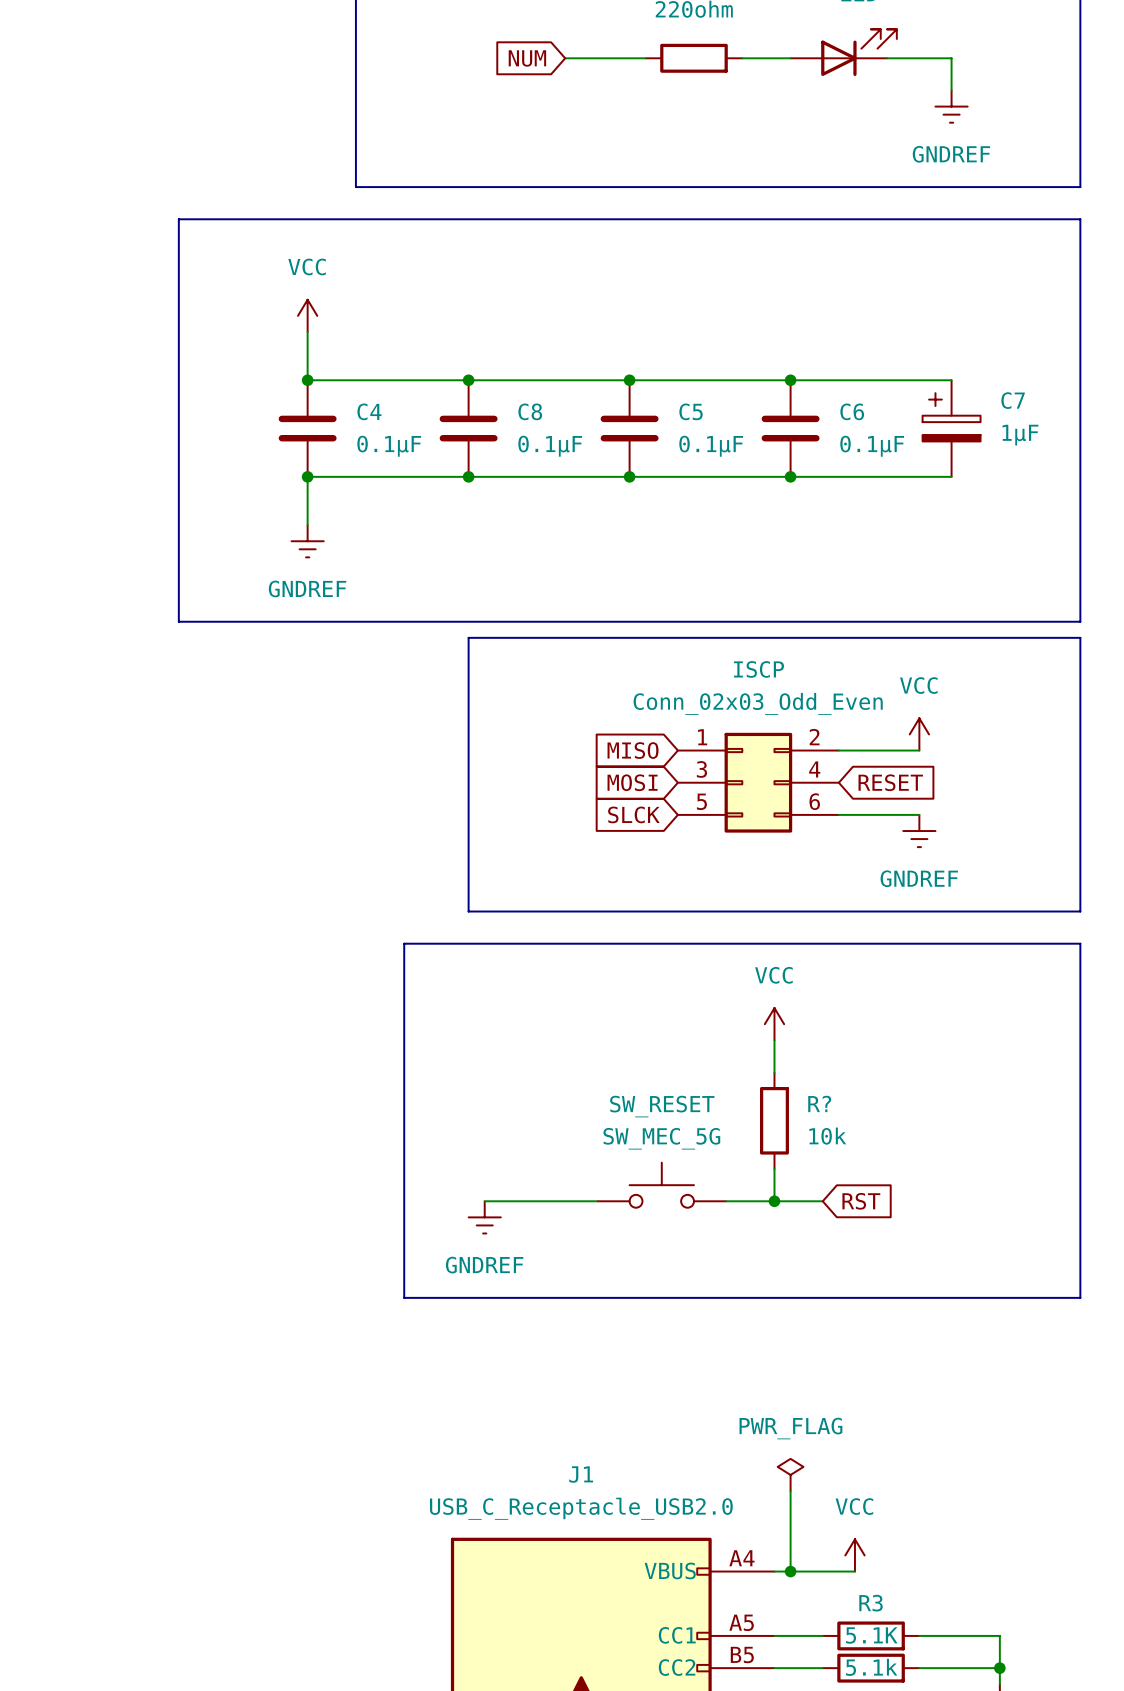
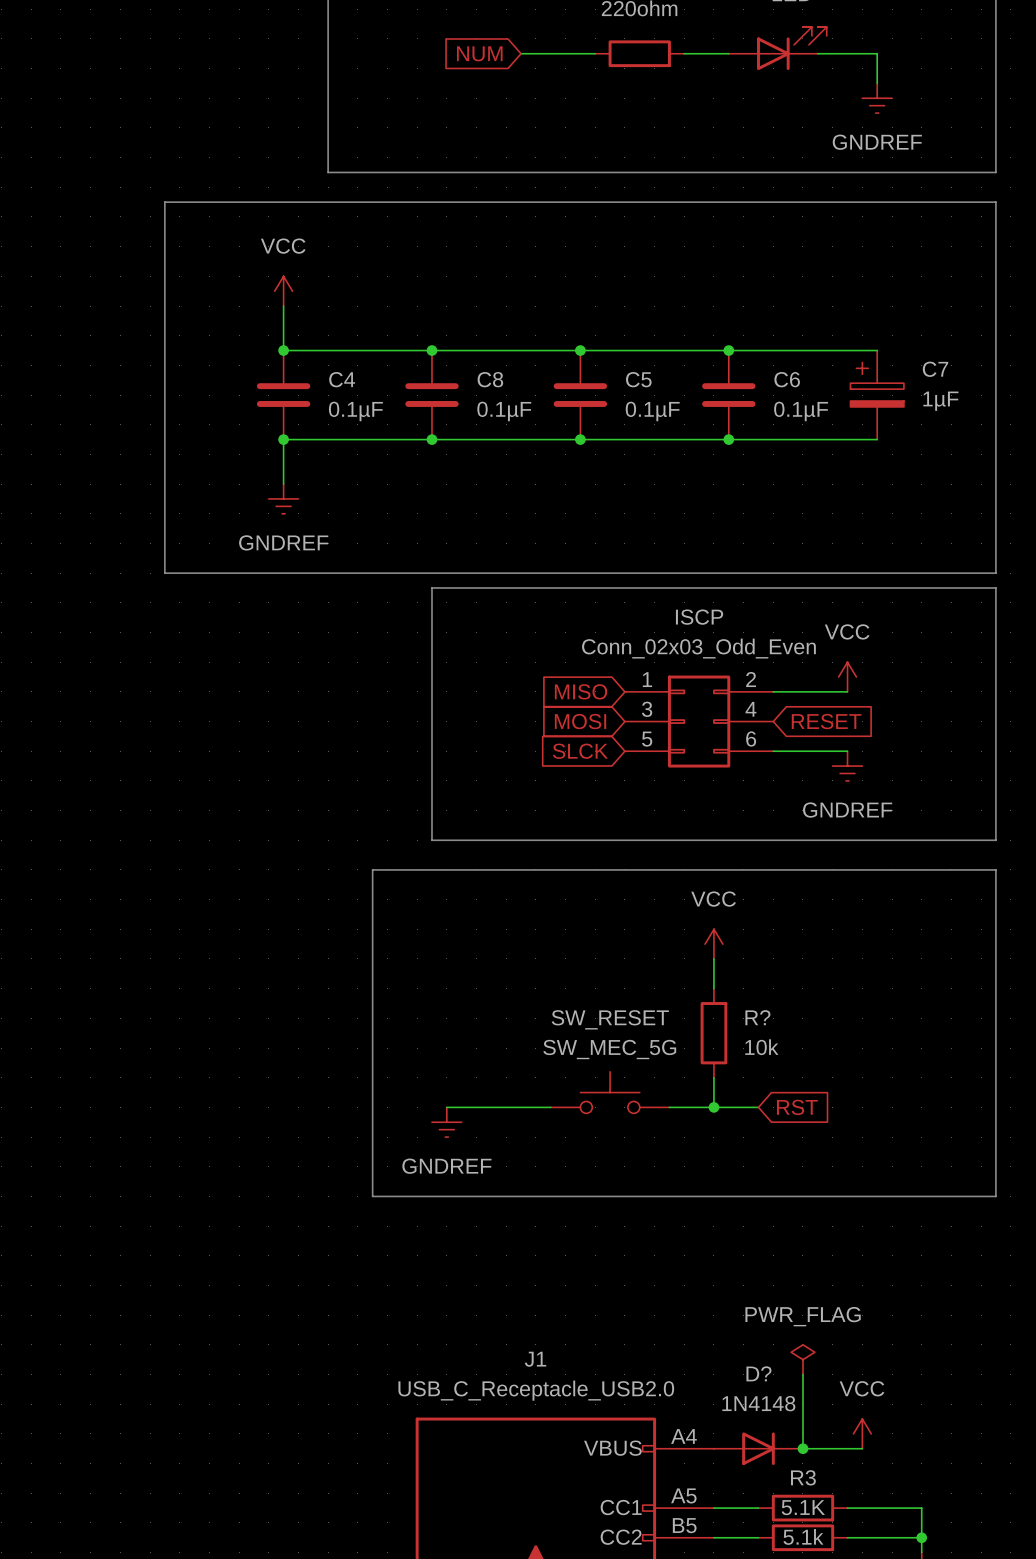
power symbol position: PWR_FLAG (790, 1474) -> PWR_FLAG (802, 1359)
wire: (790, 1491) (790, 1571) -> none
wire: none -> (802, 1374) (802, 1448) (862, 1448)
power symbol position: VCC (854, 1555) -> VCC (862, 1433)
junction: (790, 1571) -> none
D?: none -> 1N4148 (758, 1448)
junction: none -> (802, 1448)

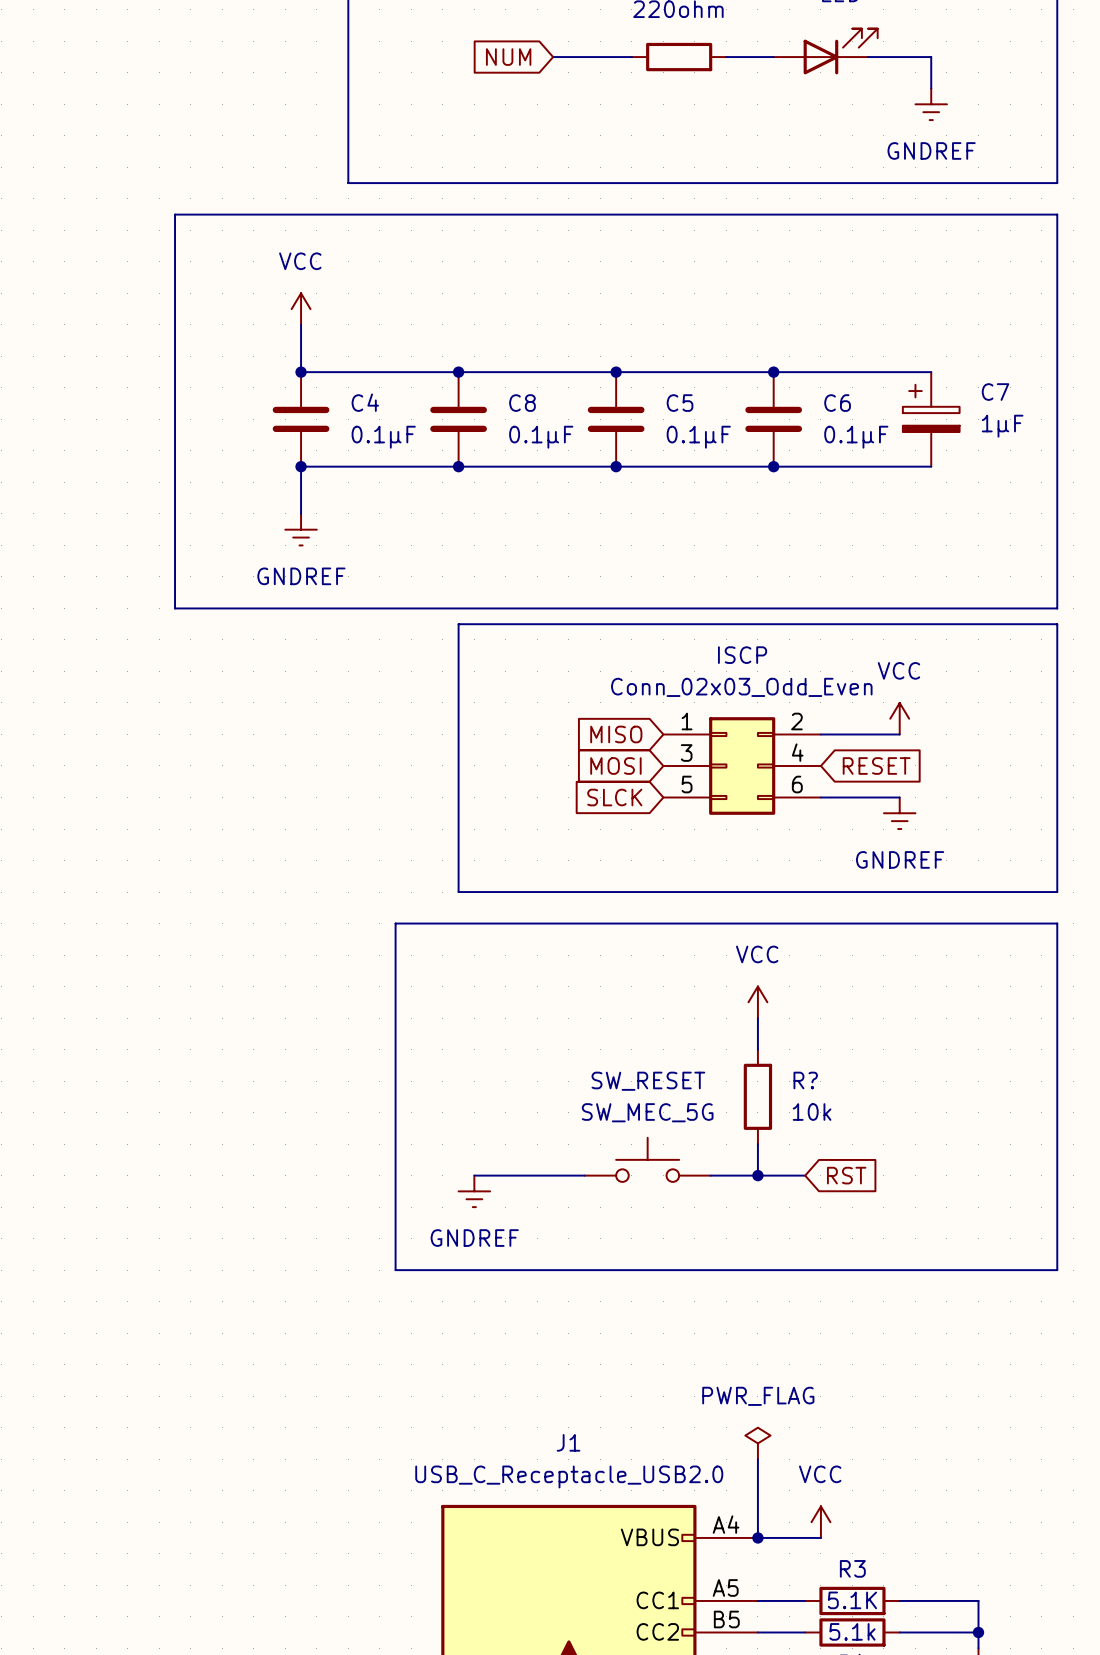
power symbol position: PWR_FLAG (802, 1359) -> PWR_FLAG (757, 1443)
wire: (802, 1374) (802, 1448) (862, 1448) -> (757, 1459) (757, 1537) (820, 1537)
power symbol position: VCC (862, 1433) -> VCC (820, 1522)
junction: none -> (757, 1537)
D?: 1N4148 (758, 1448) -> none
junction: (802, 1448) -> none

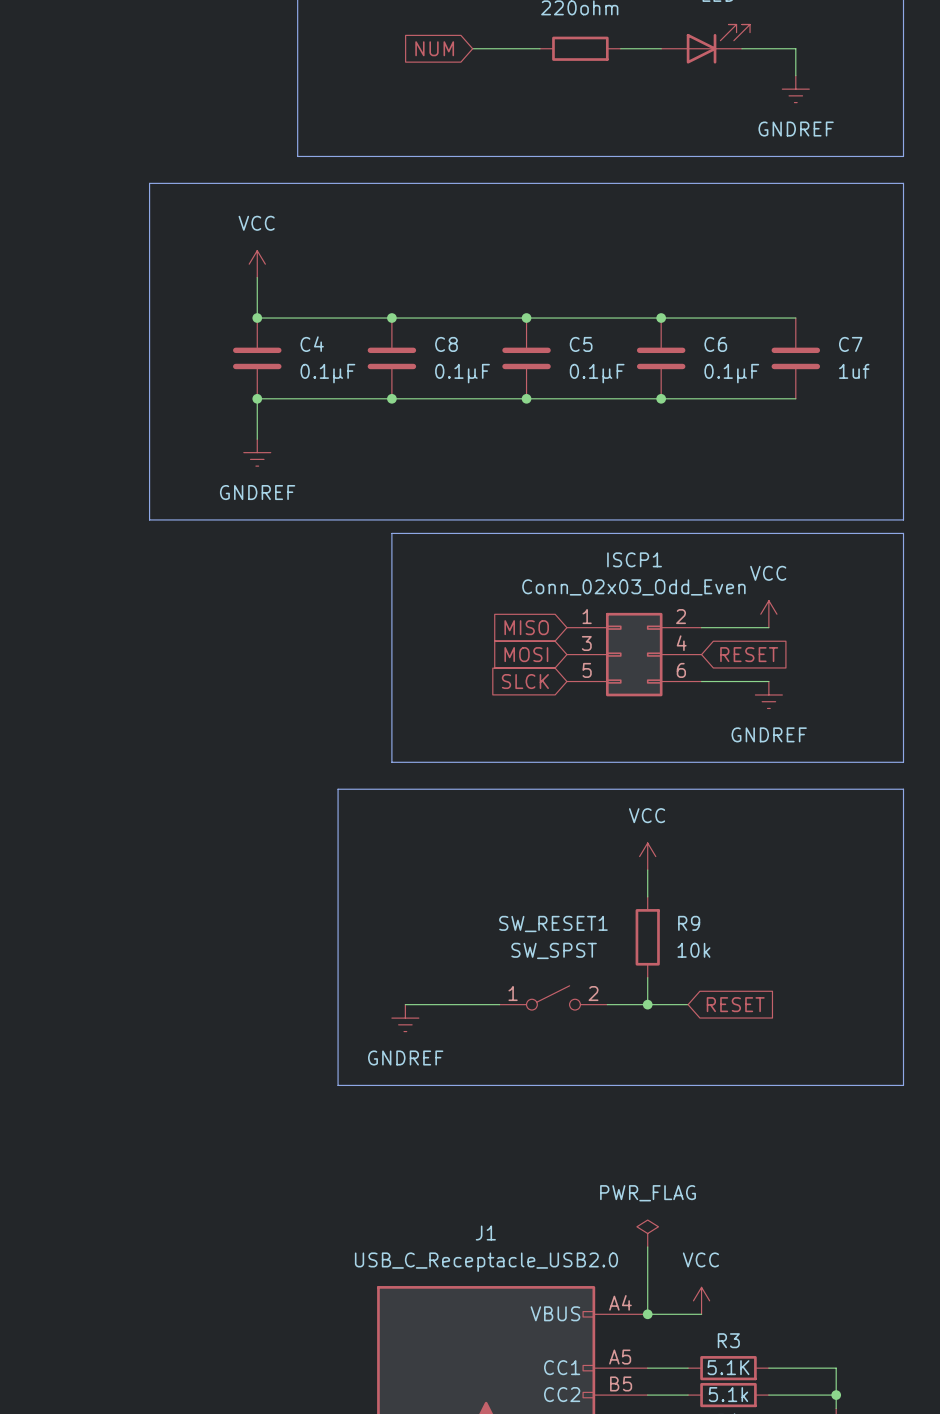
C7 symbol: [902, 372, 960, 467] -> [771, 318, 821, 399]
C7 value: 1µF (1002, 426) -> 1uf (854, 371)
ISCP name: ISCP (742, 655) -> ISCP1 (634, 559)
R? name: R? (805, 1080) -> R9 (689, 923)
SW_RESET: SW_MEC_5G (647, 1159) -> none
SW_RESET1: none -> SW_SPST (553, 997)
global label: RST (846, 1175) -> RESET (735, 1004)

